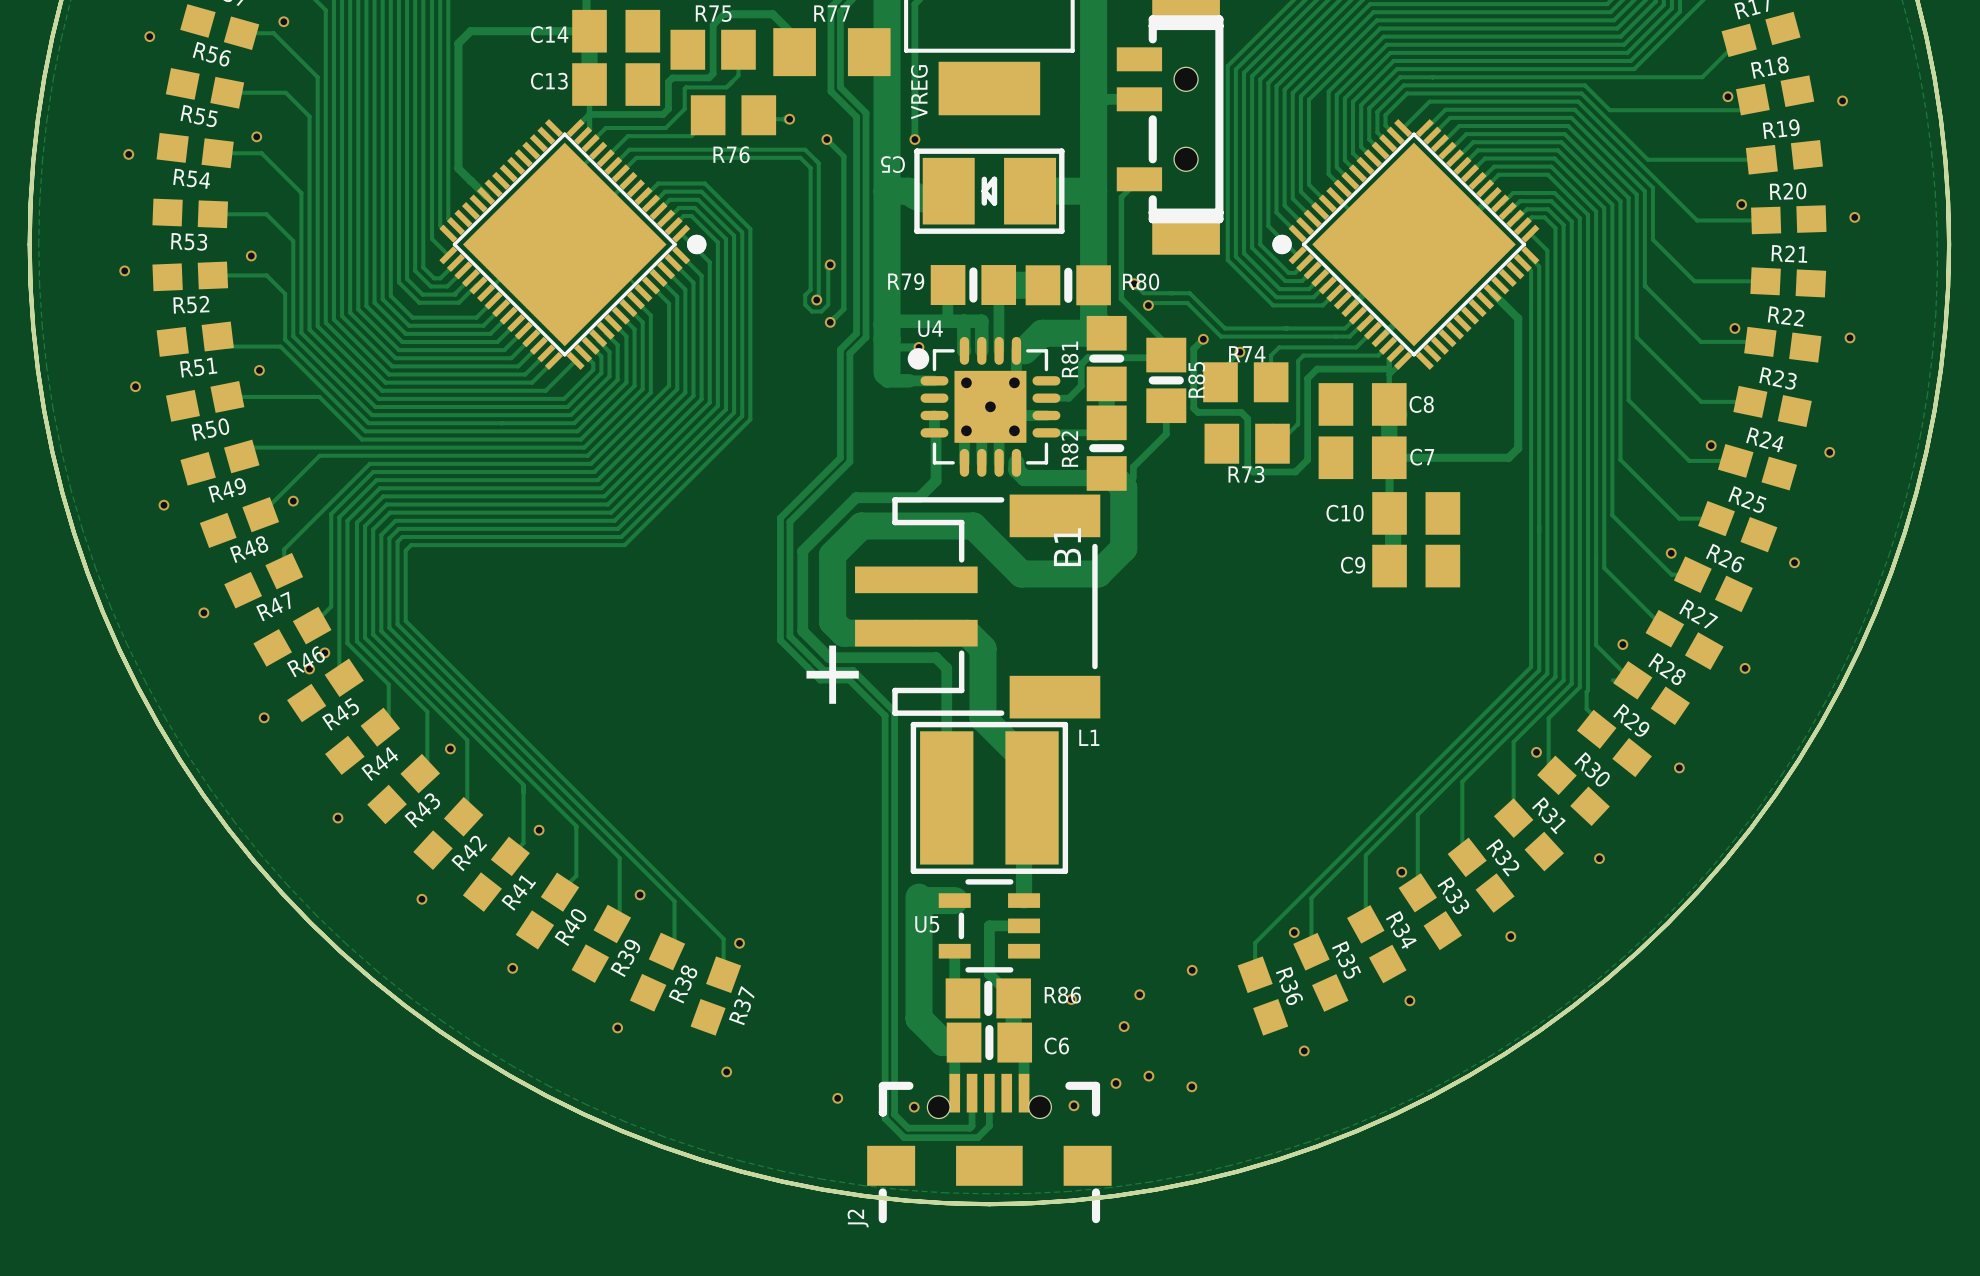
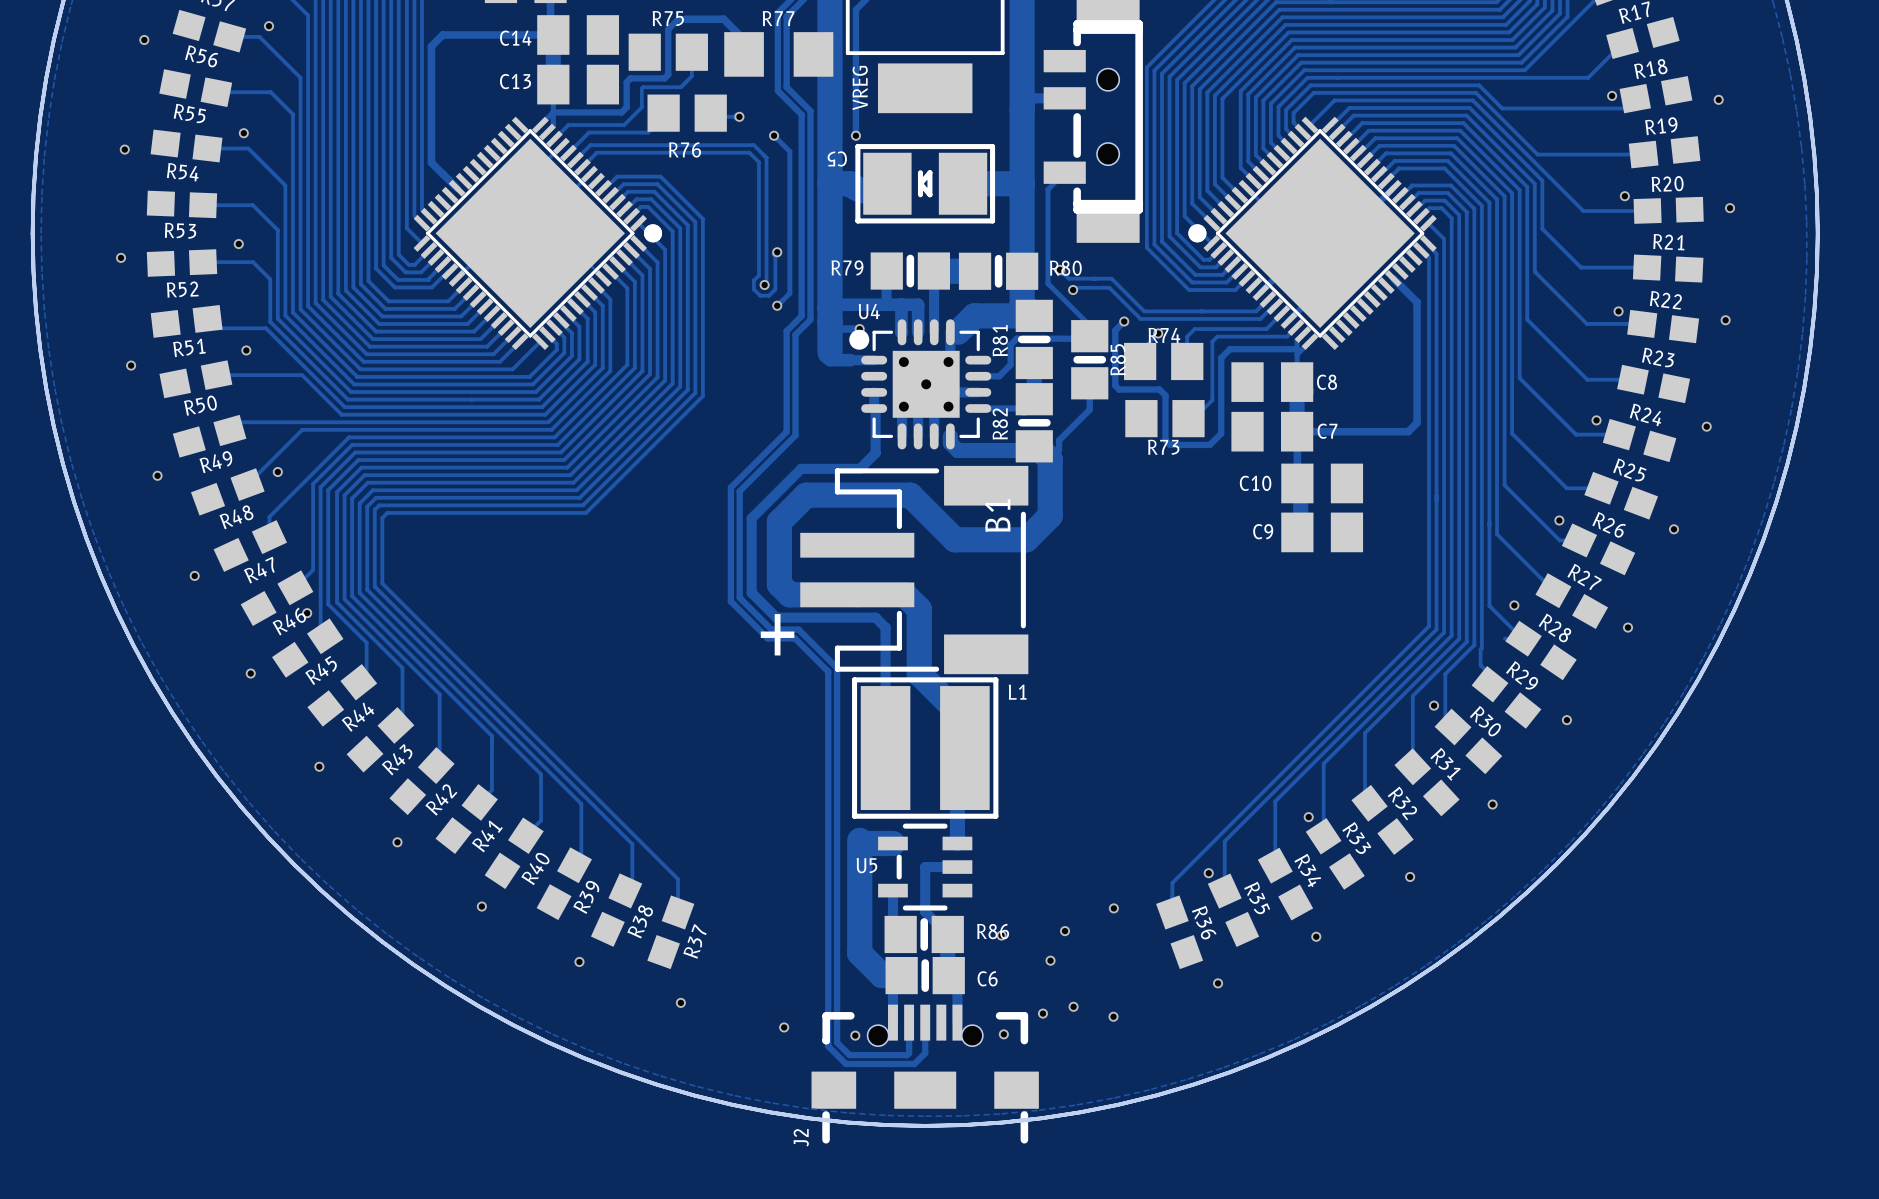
via: (309, 669) -> none
via: (450, 748) -> none
via: (539, 830) -> none
via: (640, 894) -> none
via: (739, 943) -> none

